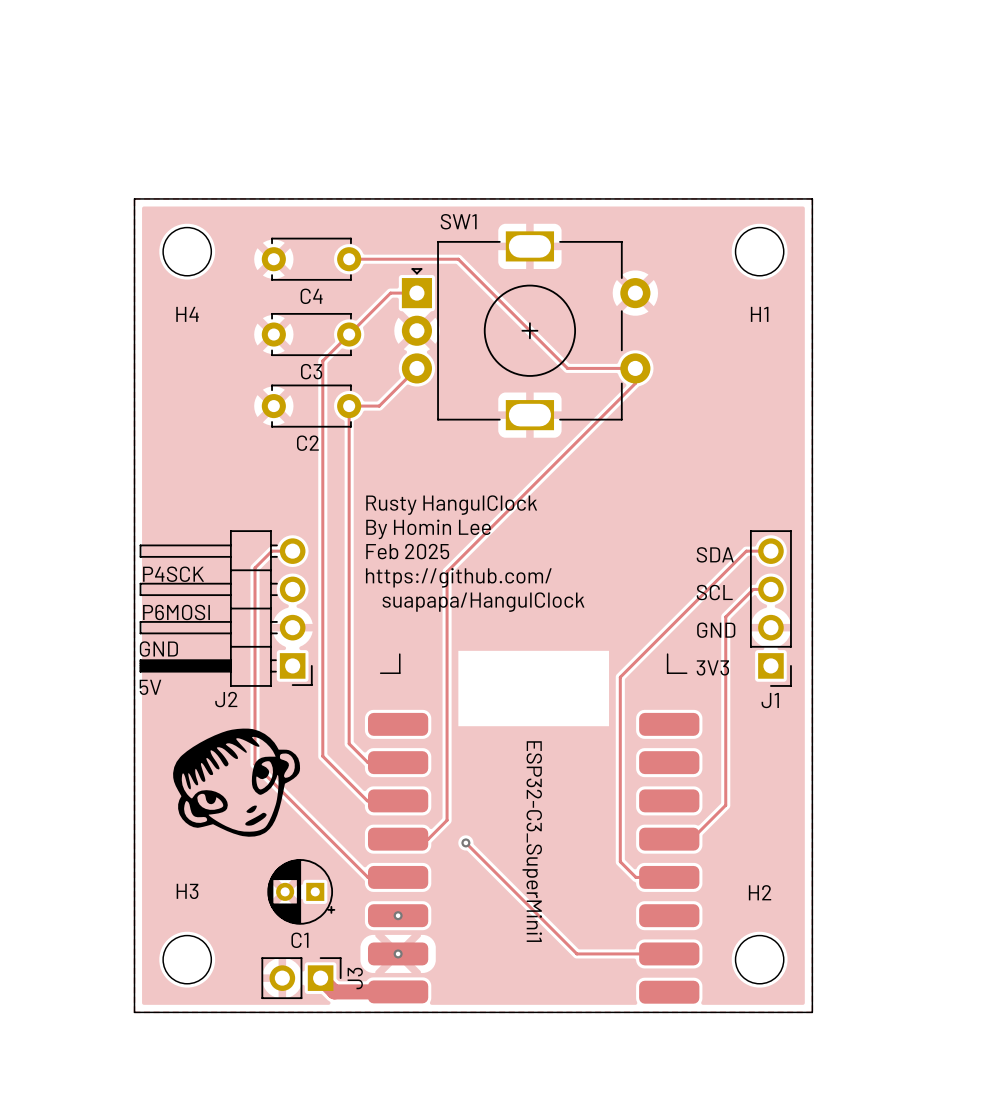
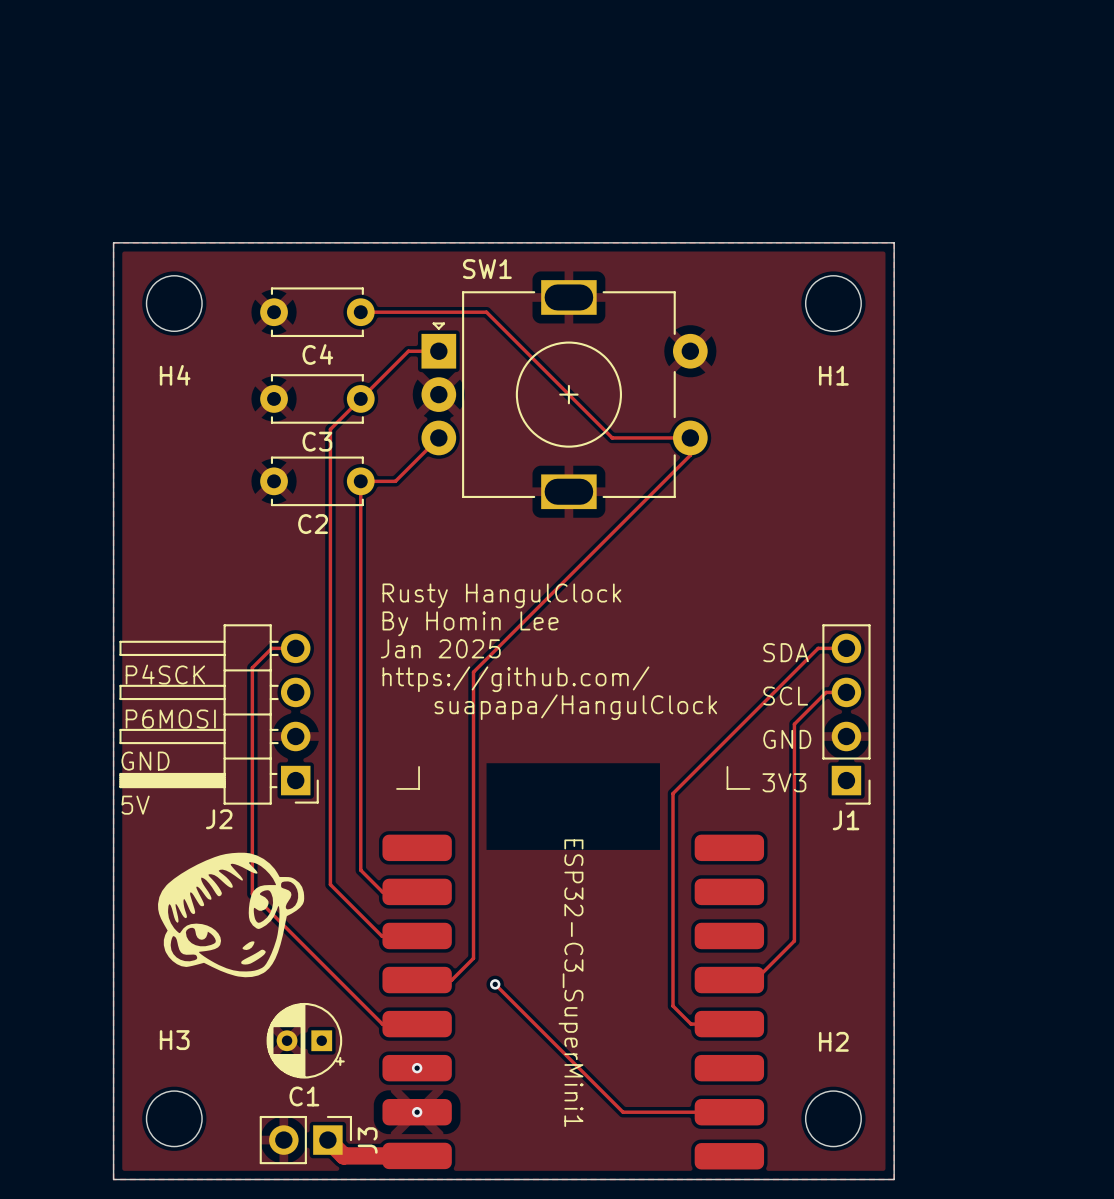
text: Feb 2025 (407, 551) -> Jan 2025 (440, 648)

